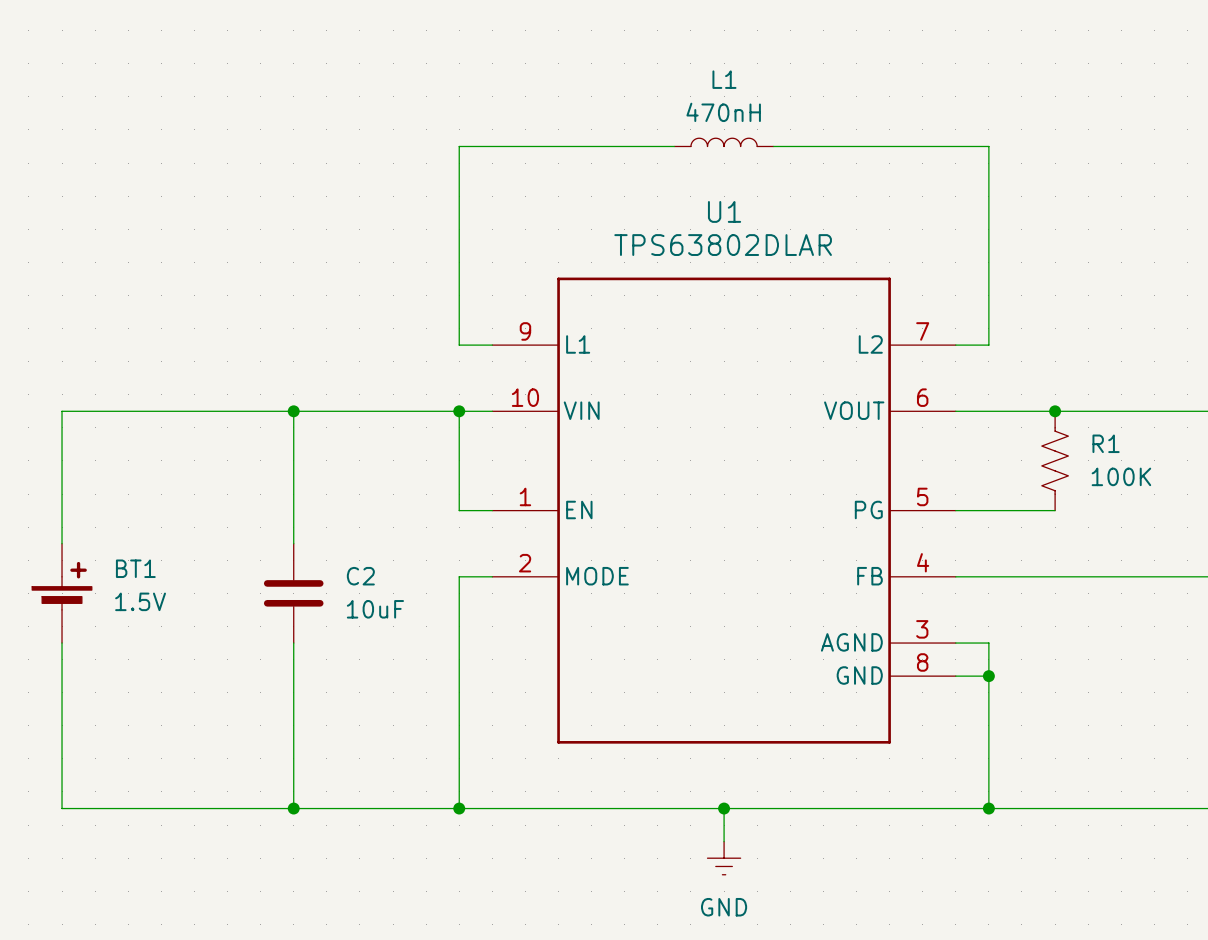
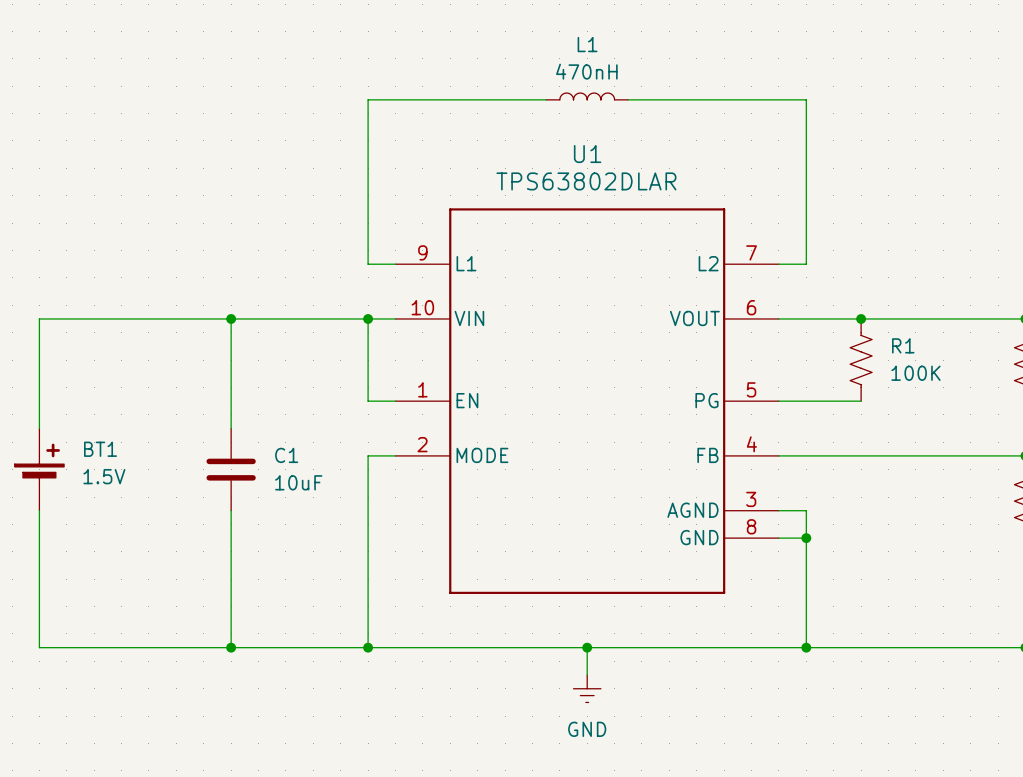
C2 name: C2 (360, 576) -> C1 (286, 455)

